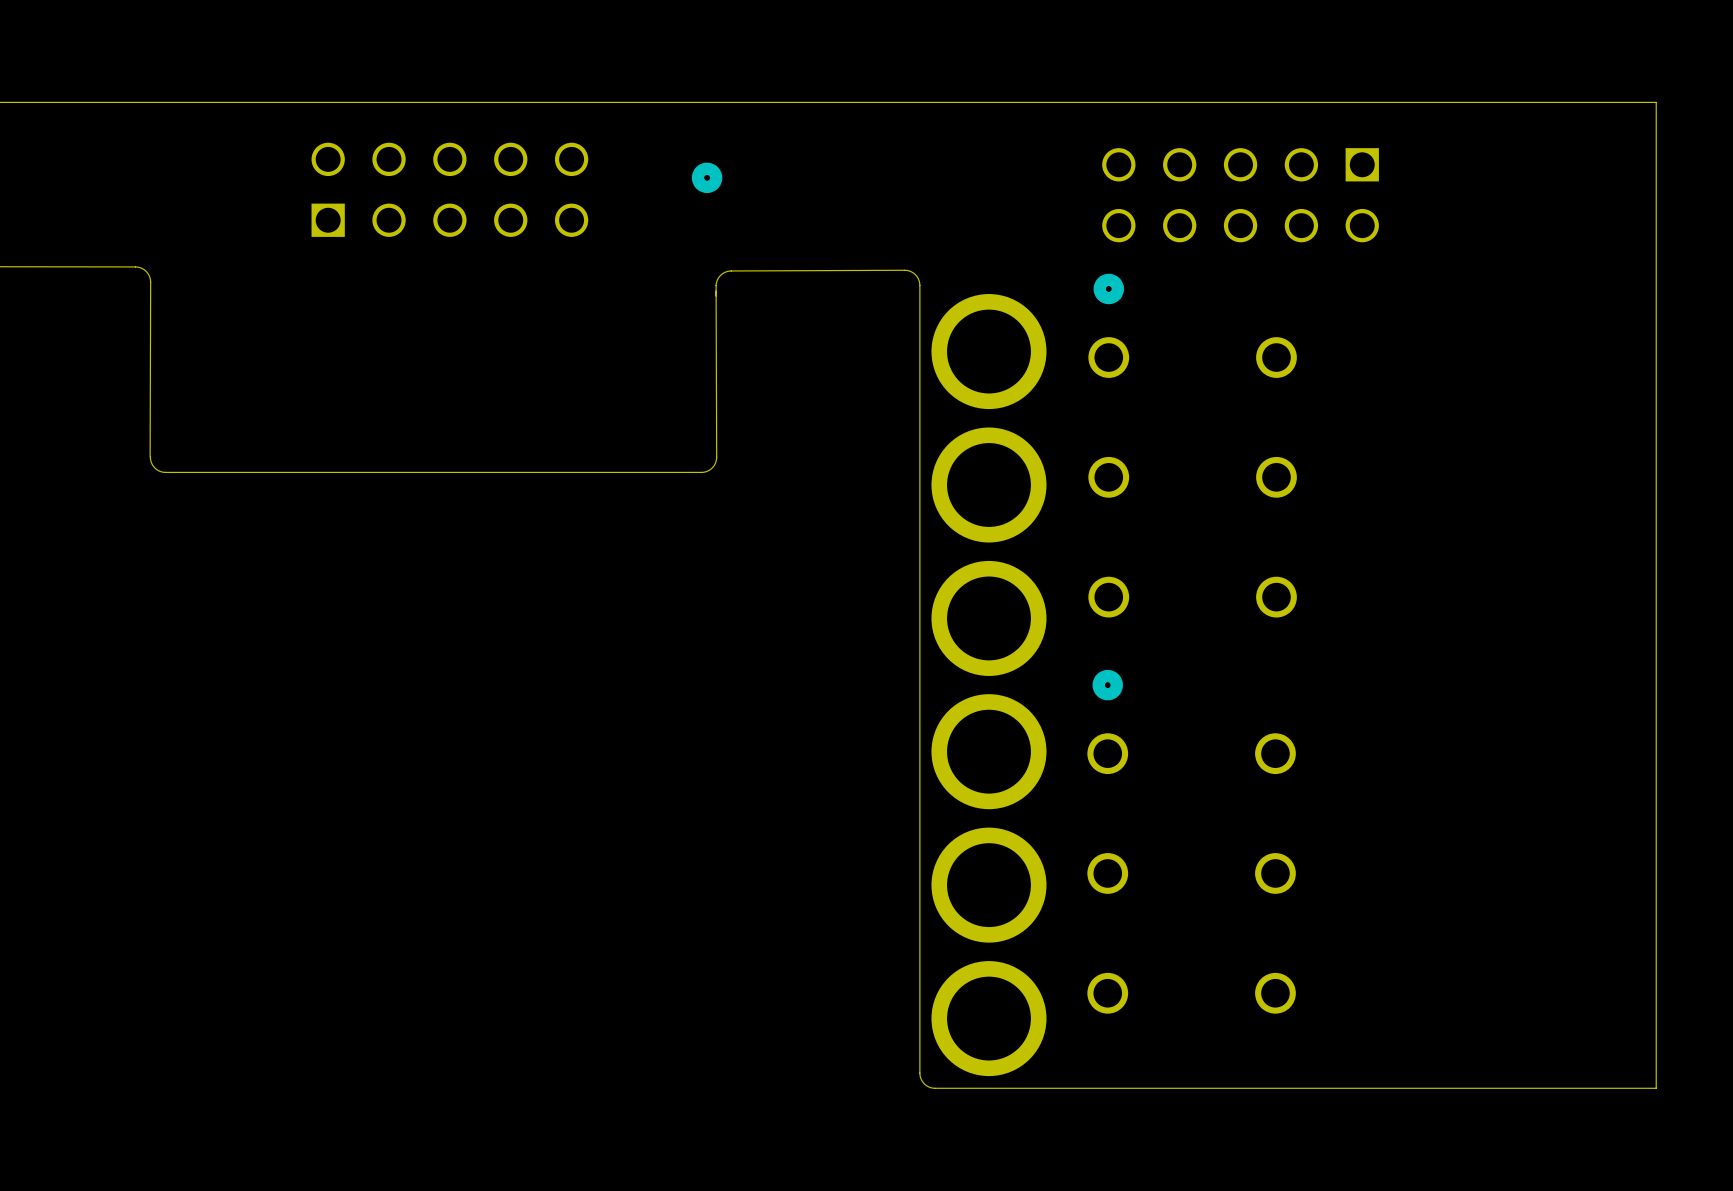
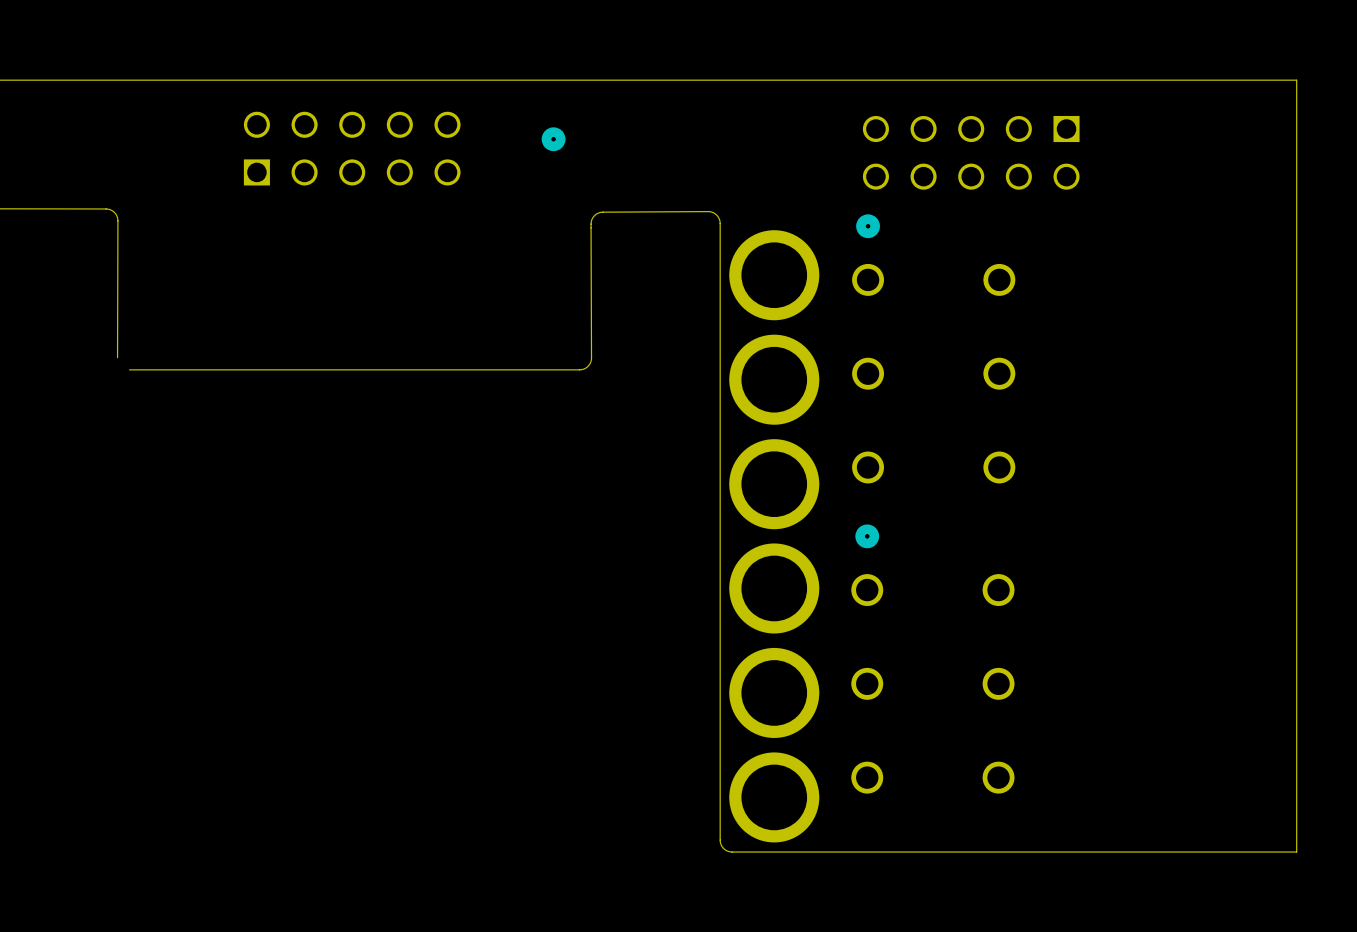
board edge: (904, 270) (731, 270) (720, 275) (716, 285) (716, 458) (712, 467) (701, 472) -> (708, 211) (602, 212) (594, 215) (591, 224) (590, 361) (582, 369) (549, 369)
board edge: (716, 291) (716, 295) -> none
board edge: (150, 457) (154, 467) (165, 472) -> none

